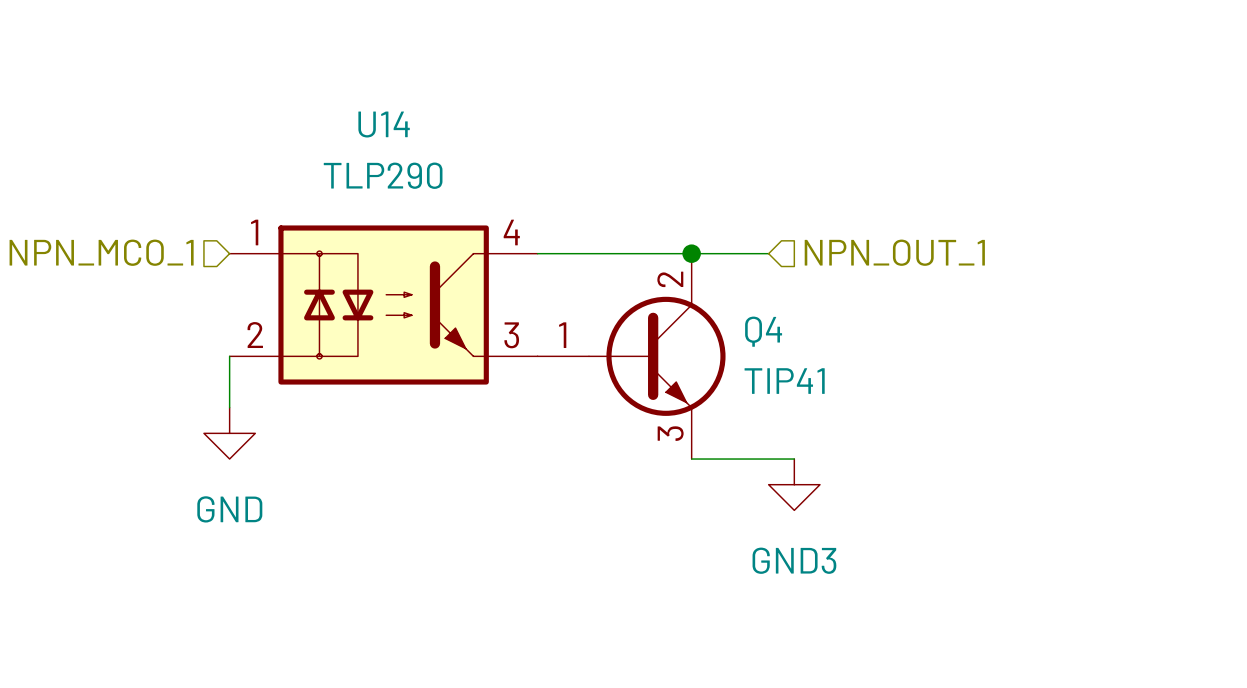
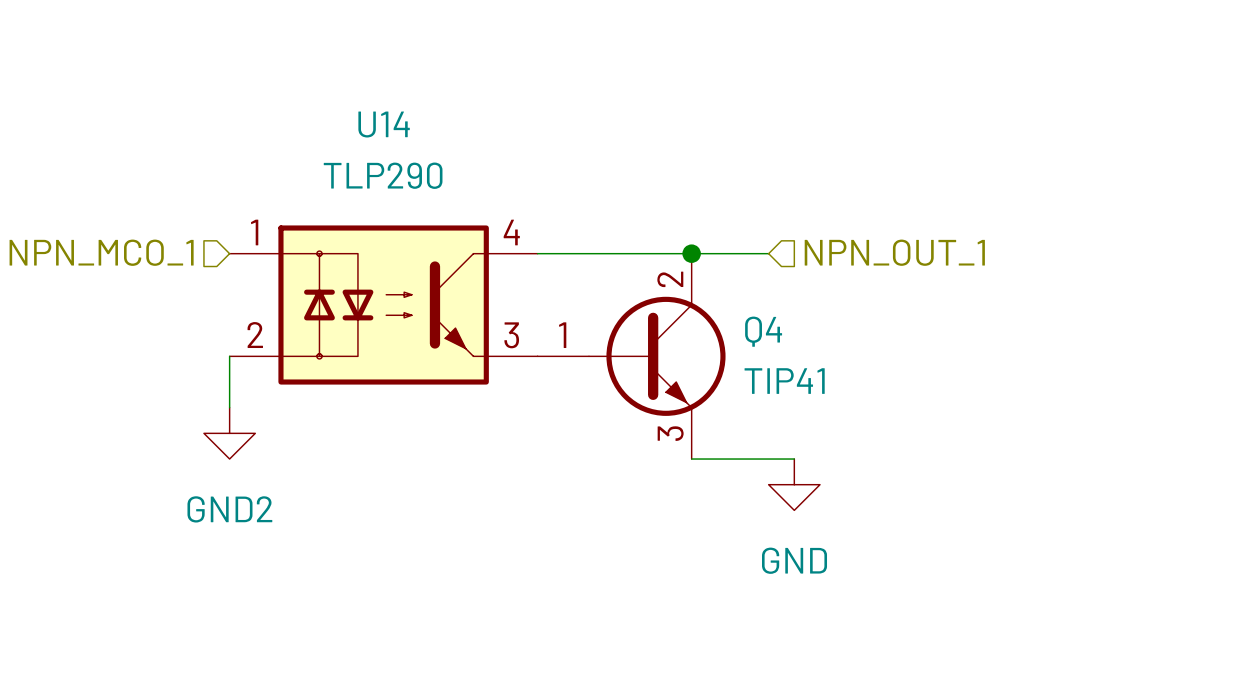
power symbol: GND (229, 433) -> GND2 (229, 433)
power symbol: GND3 (794, 484) -> GND (794, 484)

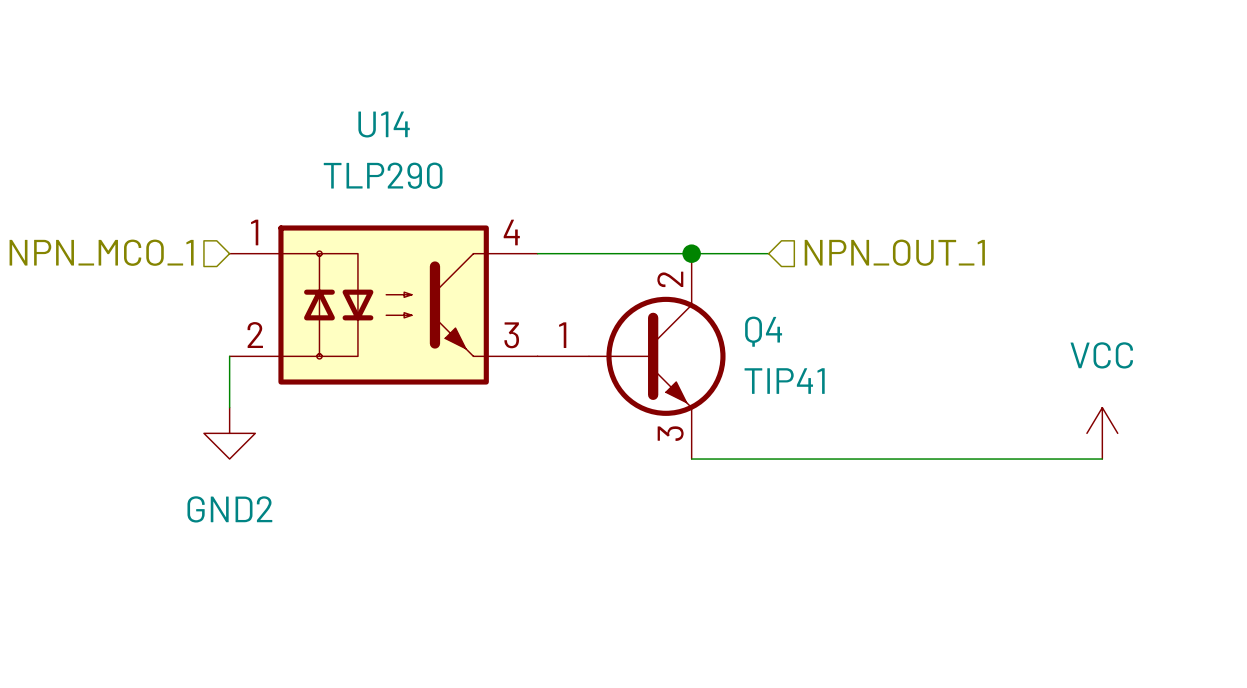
power symbol: none -> VCC (1102, 433)
wire: none -> (794, 459) (1102, 459)
power symbol: GND (794, 484) -> none

